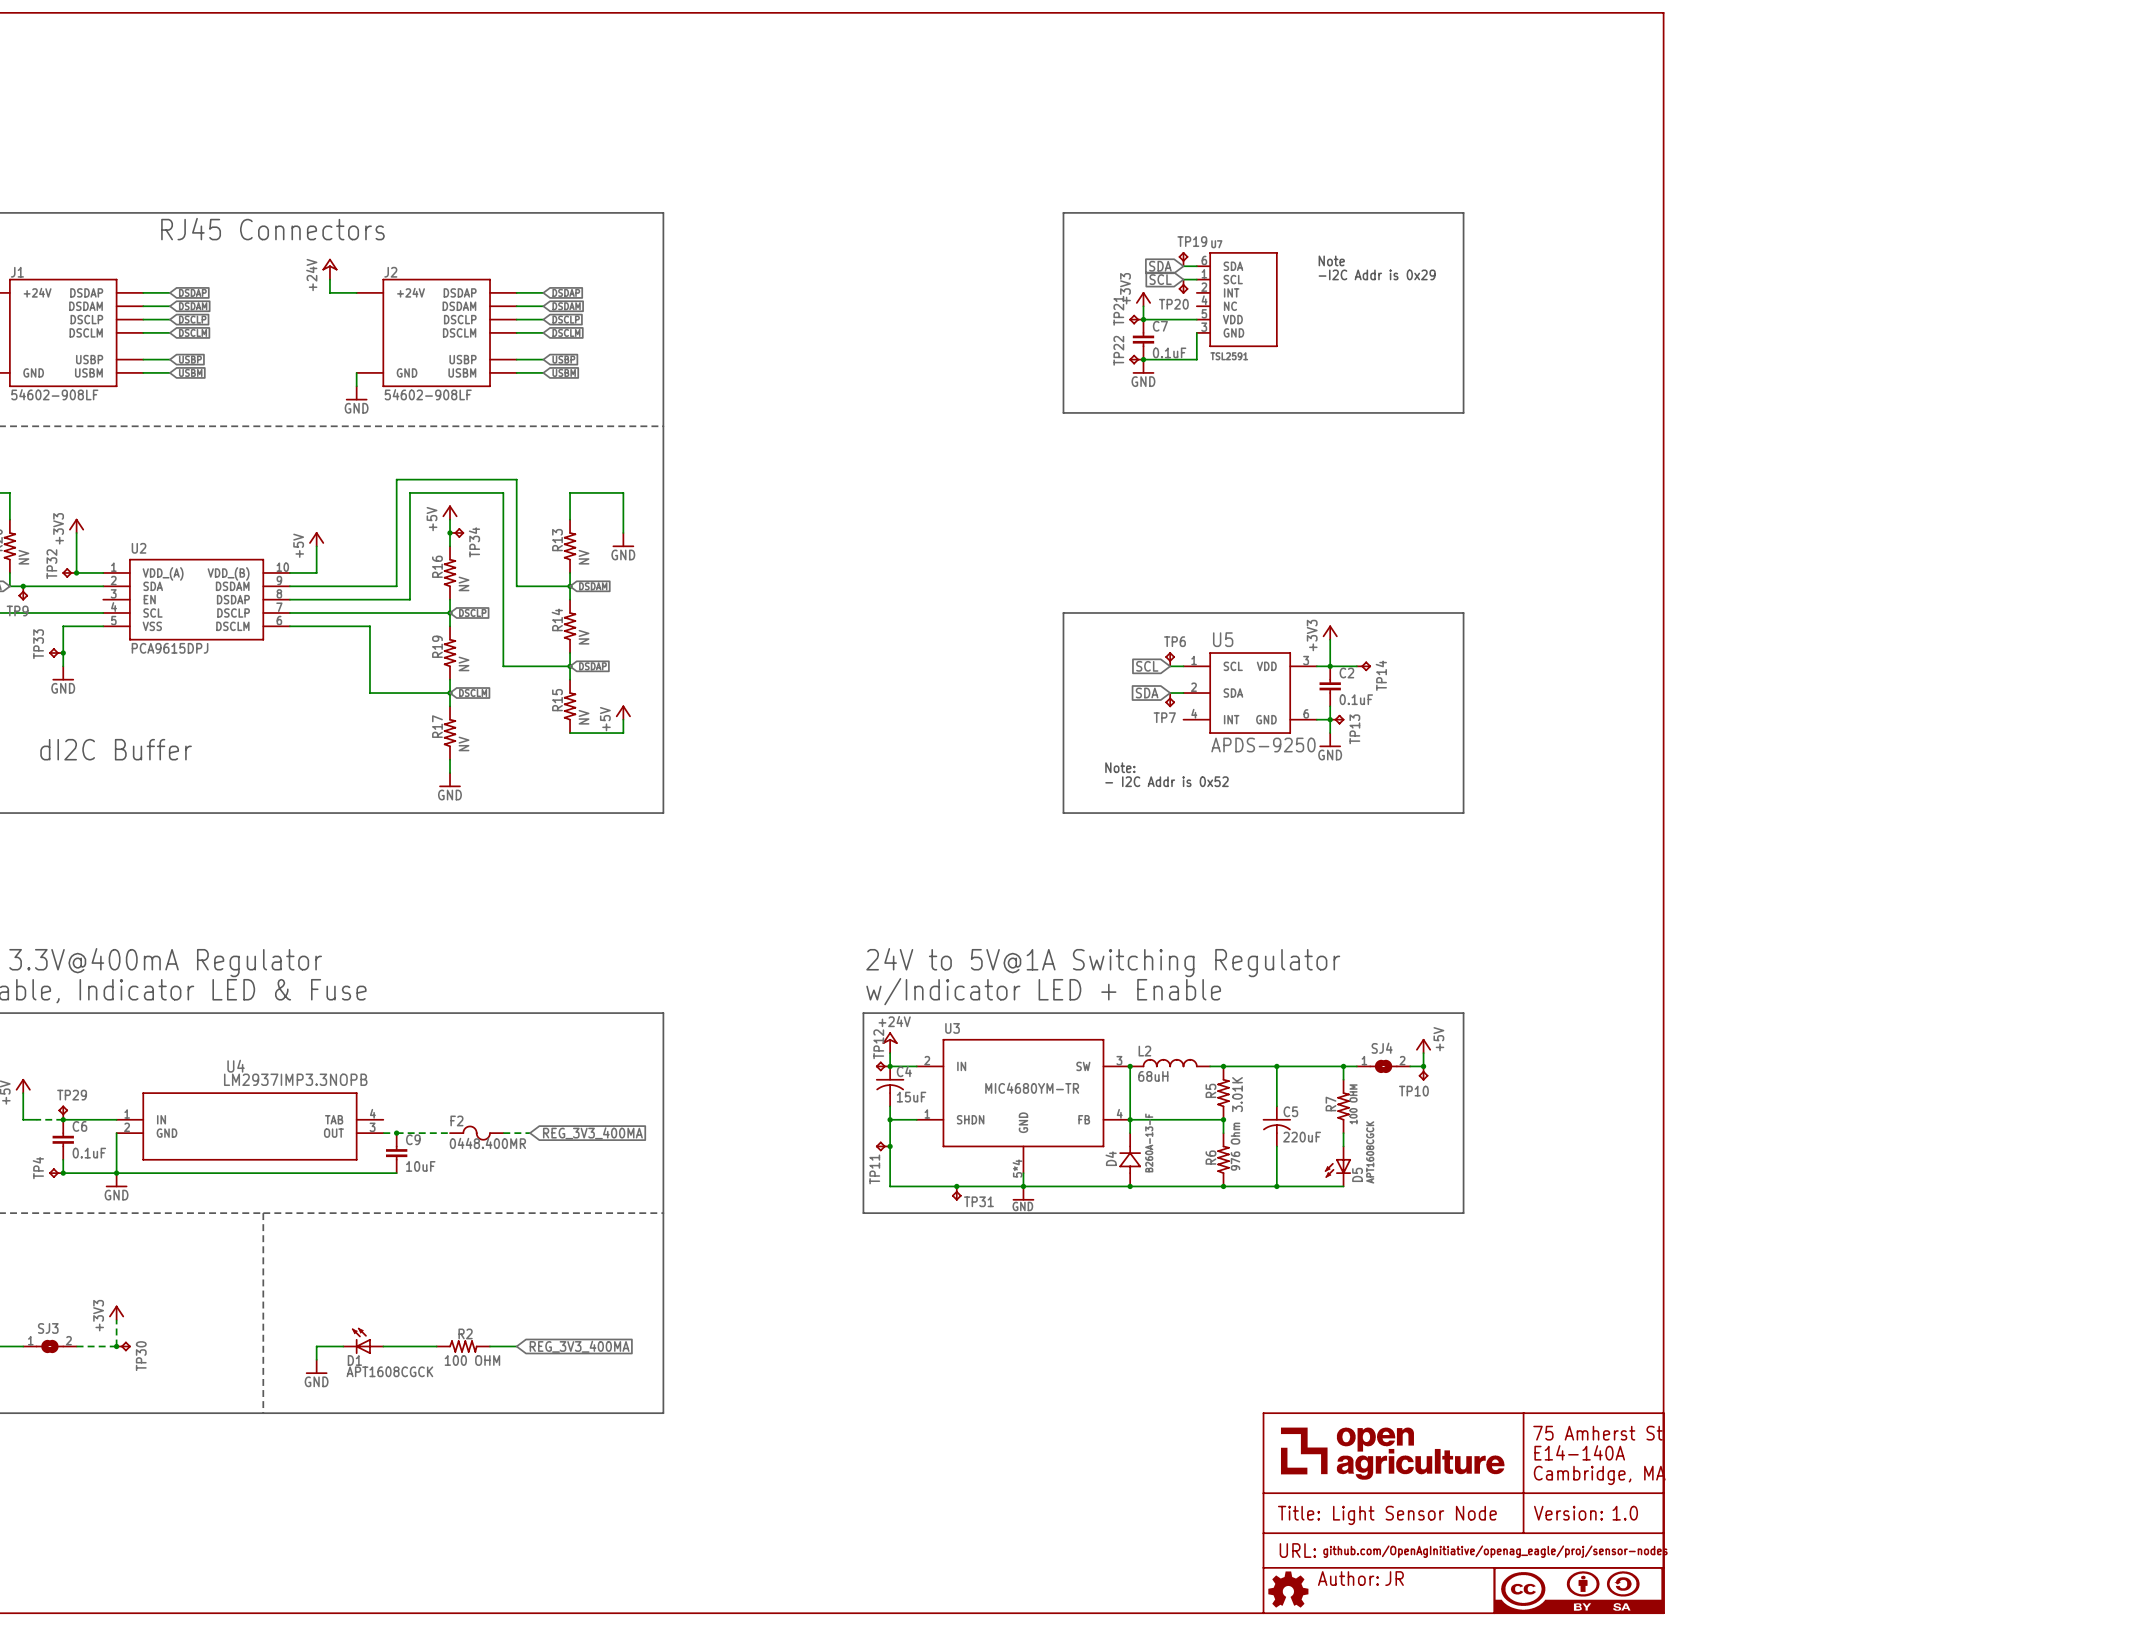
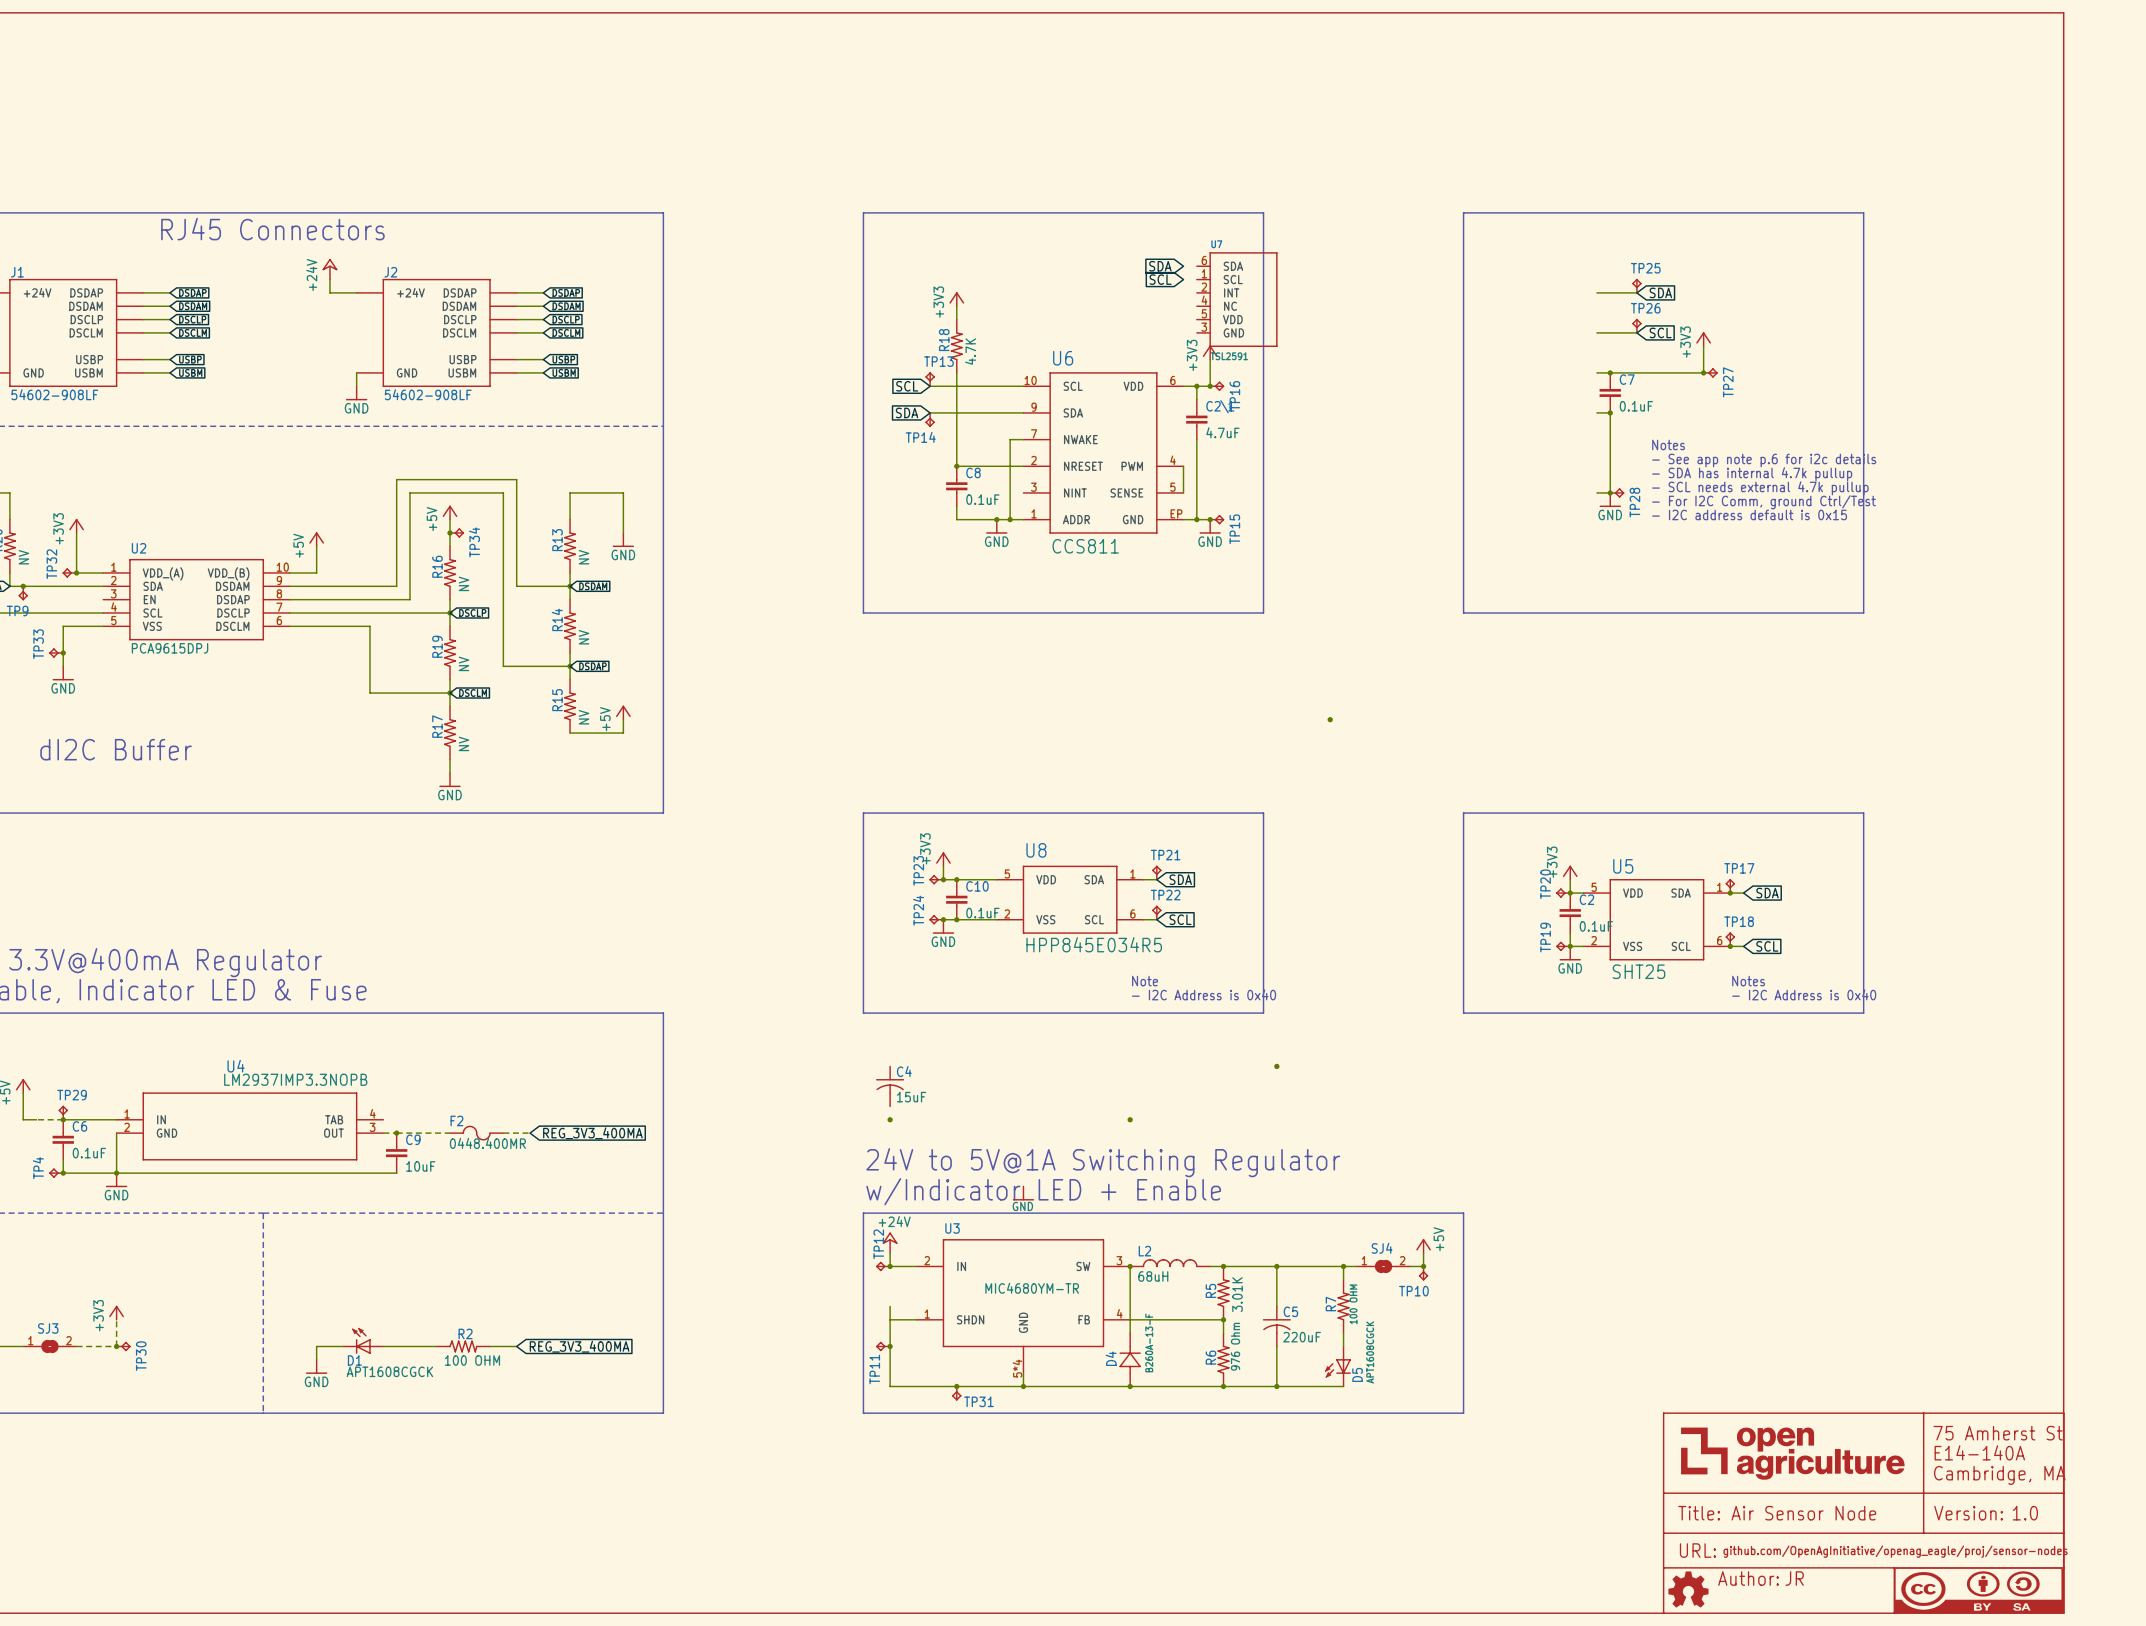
line: (1663, 12) (1663, 1613) -> (1663, 12) (2063, 12) (2063, 1613)
line: (1063, 212) (1063, 412) (1463, 412) -> (1063, 212) (863, 212) (863, 612) (1063, 612)
line: (1263, 212) (1463, 212) -> (1463, 412) (1463, 612) (1863, 612) (1863, 212) (1463, 212)
line: none -> (1263, 212) (1263, 612)
TP19 rotation: 0° (1183, 256) -> 90° counterclockwise (1560, 946)
TP19 position: (1183, 259) -> (1563, 946)
text: Note (1331, 260) -> none
wire: (1183, 266) (1196, 266) -> none
text: -I2C Addr is 0x29 (1377, 274) -> none
wire: (1183, 279) (1196, 279) -> none
TP25: none -> (1636, 285)
TP20 position: (1183, 286) -> (1563, 893)
power symbol text position: +3V3 (1125, 288) -> +3V3 (1192, 355)
TP20 rotation: 0° (1183, 288) -> 90° clockwise (1560, 893)
wire: none -> (1596, 292) (1636, 292)
global label: none -> SDA (1660, 292)
power symbol: none -> +3V3 (956, 299)
power symbol position: +3V3 (1143, 299) -> +3V3 (1210, 352)
wire: none -> (956, 306) (956, 319)
wire: (1143, 306) (1143, 319) (1196, 319) -> none
TP21 rotation: 0° (1134, 319) -> 90° clockwise (1156, 870)
TP21 position: (1136, 319) -> (1156, 872)
junction: (1143, 319) -> none
TP26: none -> (1636, 325)
wire: (1196, 332) (1196, 359) (1143, 359) -> none
wire: none -> (1596, 332) (1636, 332)
global label: none -> SCL (1660, 332)
C7 position: (1143, 339) -> (1610, 392)
power symbol: none -> +3V3 (1703, 339)
R18: none -> 4.7K (956, 346)
wire: none -> (1703, 346) (1703, 372) (1596, 372)
TP22 rotation: 0° (1134, 359) -> 90° clockwise (1156, 910)
TP22 position: (1136, 359) -> (1156, 912)
junction: (1143, 359) -> none
wire: none -> (1210, 359) (1210, 386) (1183, 386)
power symbol: GND (1143, 366) -> none
wire: none -> (956, 372) (956, 466) (1023, 466)
junction: none -> (1610, 372)
junction: none -> (1703, 372)
TP27: none -> (1710, 372)
global label: none -> SCL (907, 386)
wire: none -> (930, 386) (1023, 386)
wire: none -> (1196, 386) (1196, 399)
junction: none -> (1196, 386)
junction: none -> (1210, 386)
TP16: none -> (1217, 386)
global label: none -> SDA (907, 412)
wire: none -> (930, 412) (1023, 412)
wire: none -> (1596, 412) (1610, 412) (1610, 492) (1596, 492)
junction: none -> (1610, 412)
C2\1: none -> 4.7uF (1196, 419)
wire: none -> (1023, 439) (1010, 439) (1010, 519)
wire: none -> (1196, 439) (1196, 519)
text: none -> Notes (1668, 444)
U6: none -> CCS811 (1103, 452)
text: none -> - See app note p.6 for i2c details (1764, 460)
junction: none -> (956, 466)
wire: none -> (1183, 466) (1183, 492)
text: none -> - SDA has internal 4.7k pullup (1752, 474)
C8: none -> 0.1uF (956, 486)
text: none -> - SCL needs external 4.7k pullup (1760, 488)
junction: none -> (1610, 492)
TP28: none -> (1617, 492)
power symbol: none -> GND (1610, 499)
text: none -> - For I2C Comm, ground Ctrl/Test (1763, 502)
wire: none -> (956, 506) (956, 519) (1023, 519)
text: none -> - I2C address default is 0x15 (1749, 514)
junction: none -> (996, 519)
junction: none -> (1010, 519)
wire: none -> (1183, 519) (1210, 519)
junction: none -> (1196, 519)
junction: none -> (1210, 519)
TP15: none -> (1217, 519)
power symbol: none -> GND (996, 526)
power symbol: none -> GND (1210, 526)
line: (1063, 612) (1063, 813) -> (863, 1013) (863, 813) (1063, 813)
line: (1263, 612) (1463, 612) (1463, 813) (1263, 813) -> (1263, 1013) (1263, 813)
power symbol: +3V3 (1330, 632) -> none
wire: (1330, 639) (1330, 666) -> none
U5 symbol: [1183, 652, 1317, 734] -> [1583, 879, 1731, 961]
TP6: (1170, 659) -> none
global label: SCL (1147, 666) -> none
wire: (1170, 666) (1183, 666) -> none
wire: (1316, 666) (1356, 666) -> none
junction: (1330, 666) -> none
TP14 position: (1363, 666) -> (930, 419)
TP14 rotation: 0° (1366, 666) -> 90° clockwise (930, 422)
C2 position: (1330, 686) -> (1570, 913)
global label: SDA (1147, 693) -> none
wire: (1170, 693) (1183, 693) -> none
TP7: (1170, 700) -> none
wire: (1330, 706) (1330, 733) -> none
wire: (1316, 719) (1330, 719) -> none
TP13 position: (1337, 719) -> (930, 379)
TP13 rotation: 0° (1339, 719) -> 90° counterclockwise (930, 376)
power symbol: GND (1330, 740) -> none
U5 value: APDS-9250 (1263, 745) -> SHT25 (1638, 971)
text: Note: (1120, 767) -> none
text: - I2C Addr is 0x52 (1166, 781) -> none
line: none -> (1463, 813) (1863, 813) (1863, 1013) (1463, 1013) (1463, 813)
power symbol: none -> +3V3 (943, 859)
wire: none -> (943, 866) (943, 879) (996, 879)
power symbol: none -> +3V3 (1570, 872)
TP23: none -> (936, 879)
junction: none -> (943, 879)
junction: none -> (956, 879)
wire: none -> (1143, 879) (1156, 879)
global label: none -> SDA (1180, 879)
wire: none -> (1570, 879) (1570, 893) (1583, 893)
TP17: none -> (1730, 886)
junction: none -> (1570, 893)
wire: none -> (1730, 893) (1743, 893)
junction: none -> (1730, 893)
global label: none -> SDA (1767, 893)
C10: none -> 0.1uF (956, 899)
U8: none -> HPP845E034R5 (1070, 899)
TP24: none -> (936, 919)
wire: none -> (943, 919) (996, 919)
junction: none -> (943, 919)
junction: none -> (956, 919)
wire: none -> (1143, 919) (1156, 919)
global label: none -> SCL (1180, 919)
power symbol: none -> GND (943, 926)
wire: none -> (1570, 933) (1570, 946) (1583, 946)
TP18: none -> (1730, 939)
junction: none -> (1570, 946)
wire: none -> (1730, 946) (1743, 946)
junction: none -> (1730, 946)
global label: none -> SCL (1767, 946)
power symbol: none -> GND (1570, 953)
text: 24V to 5V@1A Switching Regulator (1103, 962) -> none
text: none -> Note (1145, 981)
text: none -> Notes (1748, 981)
text: w/Indicator LED + Enable (1043, 991) -> none
text: none -> - I2C Address is 0x40 (1204, 994)
text: none -> - I2C Address is 0x40 (1804, 994)
line: (863, 1013) (863, 1213) -> none
line: (1263, 1013) (1463, 1013) (1463, 1213) -> (863, 1213) (863, 1413) (1463, 1413) (1463, 1213)
power symbol: +24V (890, 1042) -> none
power symbol: +5V (1423, 1046) -> none
wire: (890, 1053) (890, 1066) (916, 1066) -> none
wire: (1423, 1053) (1423, 1066) (1410, 1066) -> none
L2 position: (1170, 1063) -> (1170, 1263)
TP12 position: (883, 1066) -> (883, 1266)
junction: (890, 1066) -> none
wire: (1130, 1066) (1130, 1133) -> none
junction: (1130, 1066) -> none
wire: (1210, 1066) (1356, 1066) -> none
junction: (1223, 1066) -> none
wire: (1276, 1066) (1276, 1106) -> none
wire: (1343, 1066) (1343, 1079) -> none
junction: (1343, 1066) -> none
SJ4 position: (1383, 1066) -> (1383, 1266)
junction: (1423, 1066) -> none
TP10 position: (1423, 1073) -> (1423, 1273)
R5 position: (1223, 1093) -> (1223, 1293)
wire: (890, 1106) (890, 1186) (1343, 1186) -> none
U3 position: (1023, 1106) -> (1023, 1306)
R7 position: (1343, 1106) -> (1343, 1306)
wire: (890, 1119) (916, 1119) -> none
wire: (1130, 1119) (1223, 1119) (1223, 1133) -> none
junction: (1223, 1119) -> none
C5 position: (1276, 1126) -> (1276, 1326)
wire: (1343, 1133) (1343, 1146) -> none
TP11 position: (883, 1146) -> (883, 1346)
junction: (890, 1146) -> none
wire: (1276, 1146) (1276, 1186) -> (1276, 1266) (1276, 1306)
D4 position: (1130, 1159) -> (1130, 1359)
R6 position: (1223, 1159) -> (1223, 1359)
text: none -> 24V to 5V@1A Switching Regulator (1103, 1162)
D5 position: (1338, 1166) -> (1338, 1366)
wire: (1023, 1173) (1023, 1186) -> none
junction: (956, 1186) -> none
junction: (1023, 1186) -> none
junction: (1130, 1186) -> none
junction: (1223, 1186) -> none
junction: (1276, 1186) -> none
text: none -> w/Indicator LED + Enable (1043, 1191)
TP31 position: (956, 1193) -> (956, 1393)
power symbol: none -> +24V (890, 1242)
power symbol: none -> +5V (1423, 1246)
wire: none -> (890, 1253) (890, 1266) (916, 1266)
wire: none -> (1423, 1253) (1423, 1266) (1410, 1266)
junction: none -> (890, 1266)
wire: none -> (1130, 1266) (1130, 1333)
junction: none -> (1130, 1266)
wire: none -> (1210, 1266) (1356, 1266)
junction: none -> (1223, 1266)
junction: none -> (1276, 1266)
wire: none -> (1343, 1266) (1343, 1279)
junction: none -> (1343, 1266)
junction: none -> (1423, 1266)
wire: none -> (890, 1306) (890, 1386) (1343, 1386)
wire: none -> (890, 1319) (916, 1319)
wire: none -> (1130, 1319) (1223, 1319) (1223, 1333)
junction: none -> (1223, 1319)
wire: none -> (1343, 1333) (1343, 1346)
junction: none -> (890, 1346)
wire: none -> (1276, 1346) (1276, 1386)
wire: none -> (1023, 1373) (1023, 1386)
junction: none -> (956, 1386)
junction: none -> (1023, 1386)
junction: none -> (1130, 1386)
junction: none -> (1223, 1386)
junction: none -> (1276, 1386)
part: (1463, 1513) -> none
part: none -> (1863, 1513)
line: none -> (1263, 1613) (1663, 1613)

